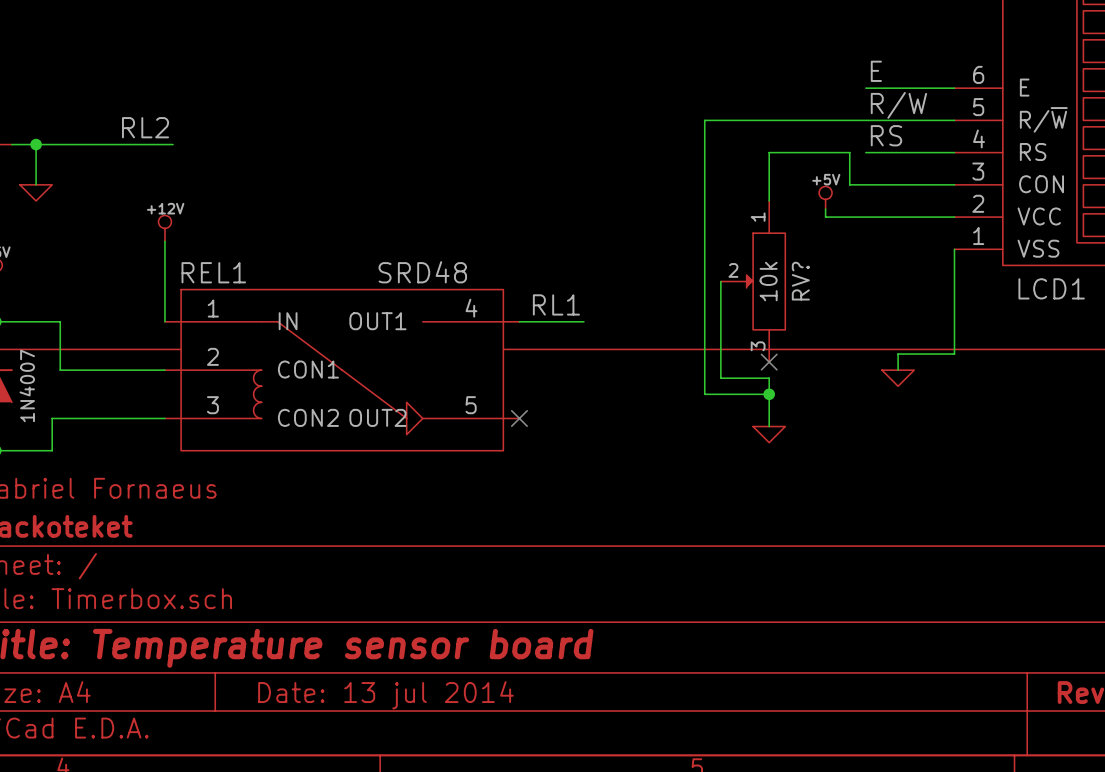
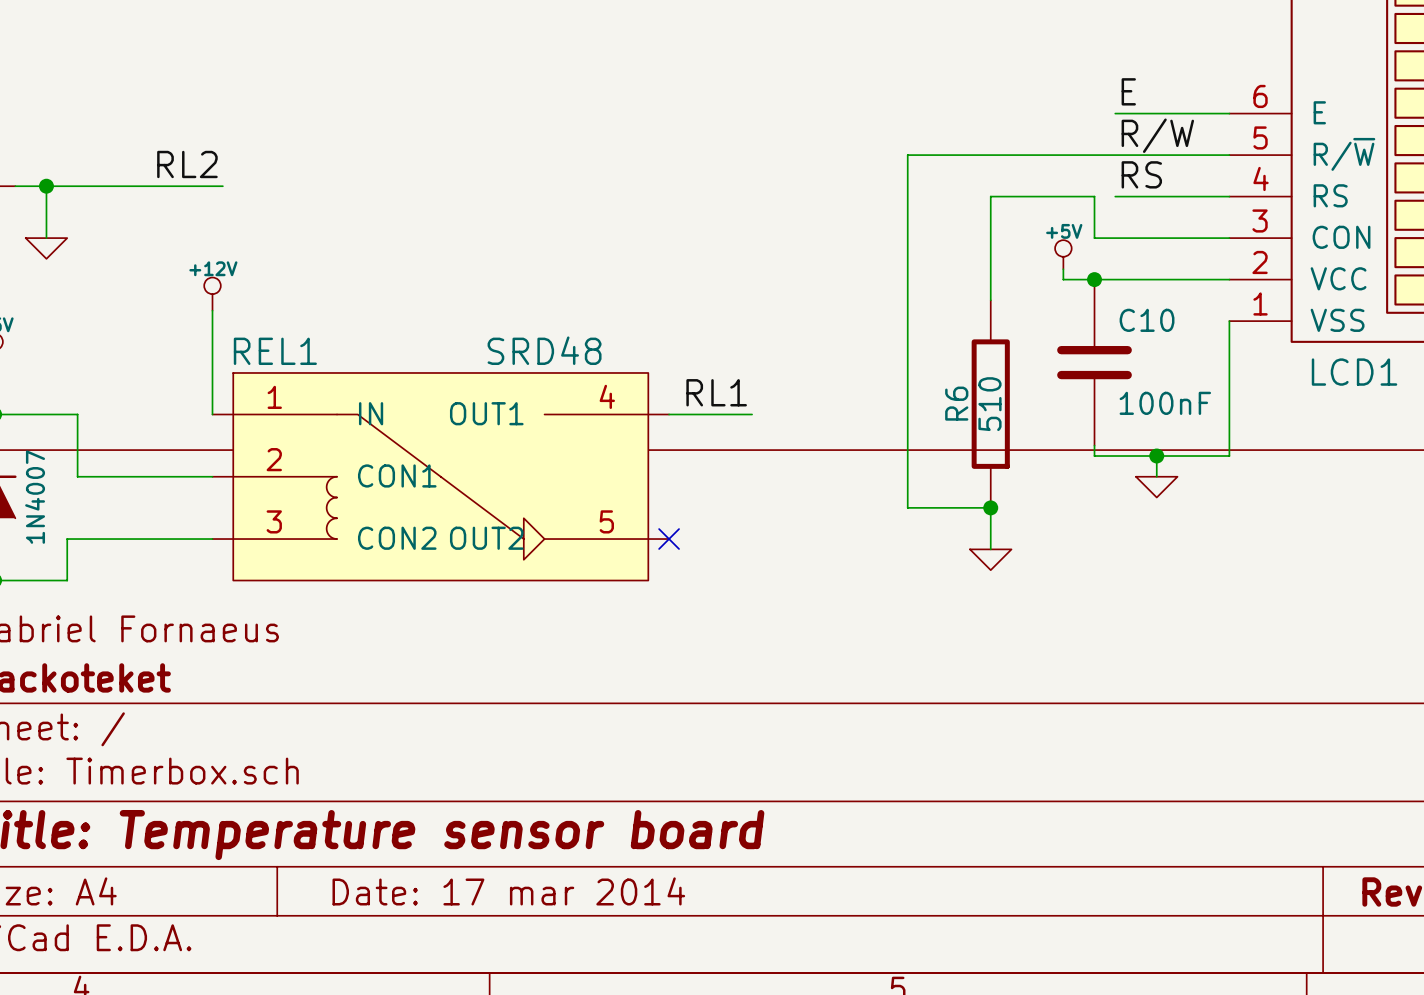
junction: none -> (1094, 279)
wire: (720, 281) (720, 378) (769, 378) (769, 394) -> none
RV?: 10k (753, 281) -> none
C10: none -> 100nF (1094, 362)
R6: none -> 510 (990, 404)
wire: none -> (1094, 445) (1094, 456) (1156, 456)
junction: none -> (1156, 456)
no-connect mark: (769, 362) -> none
title block: Date: 13 jul 2014 (385, 695) -> Date: 17 mar 2014 (508, 891)

